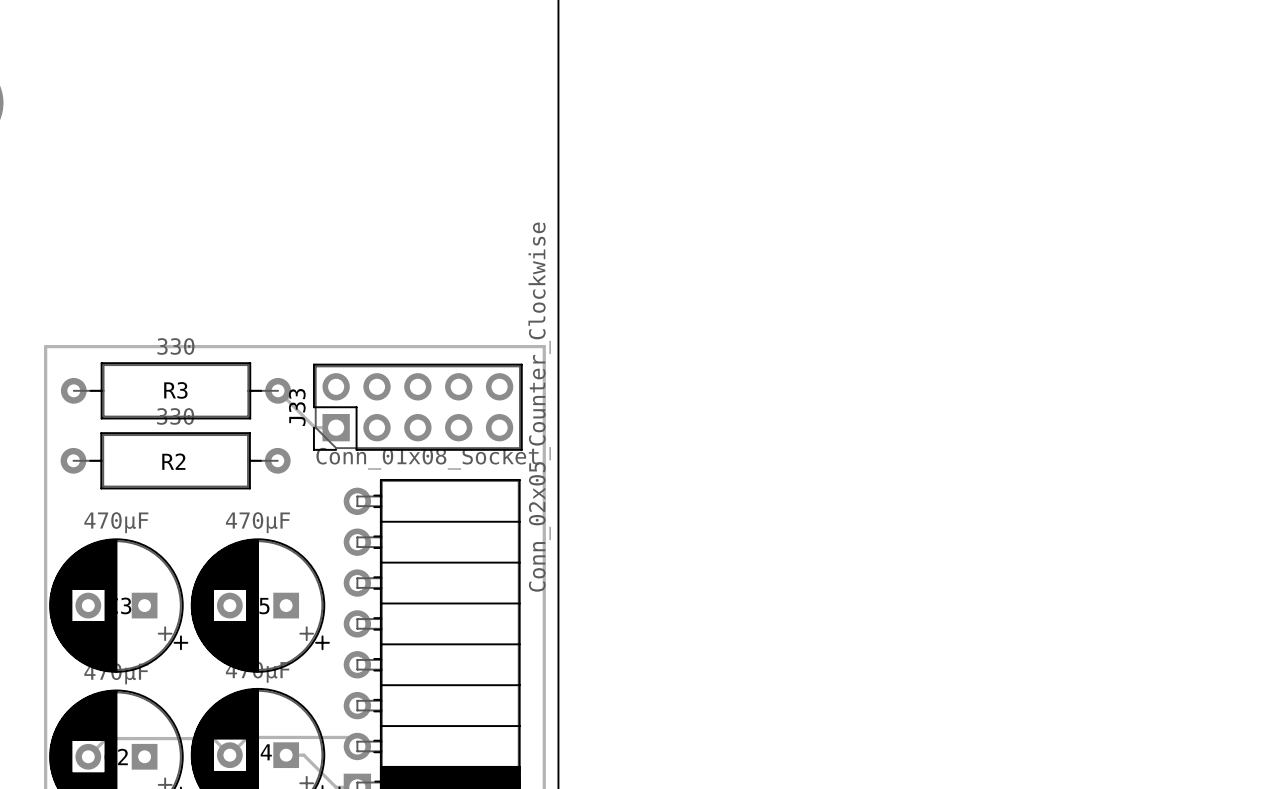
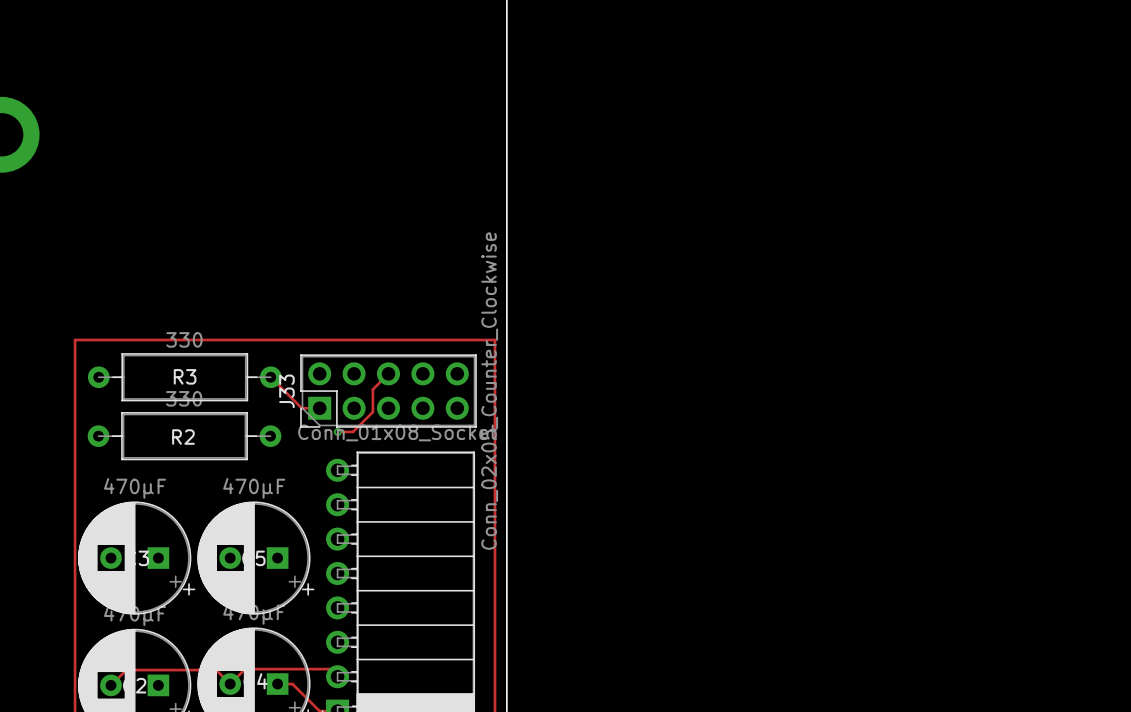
track: none -> (388, 373) (372, 389) (372, 412) (353, 431) (337, 431)
via: none -> (337, 431)

